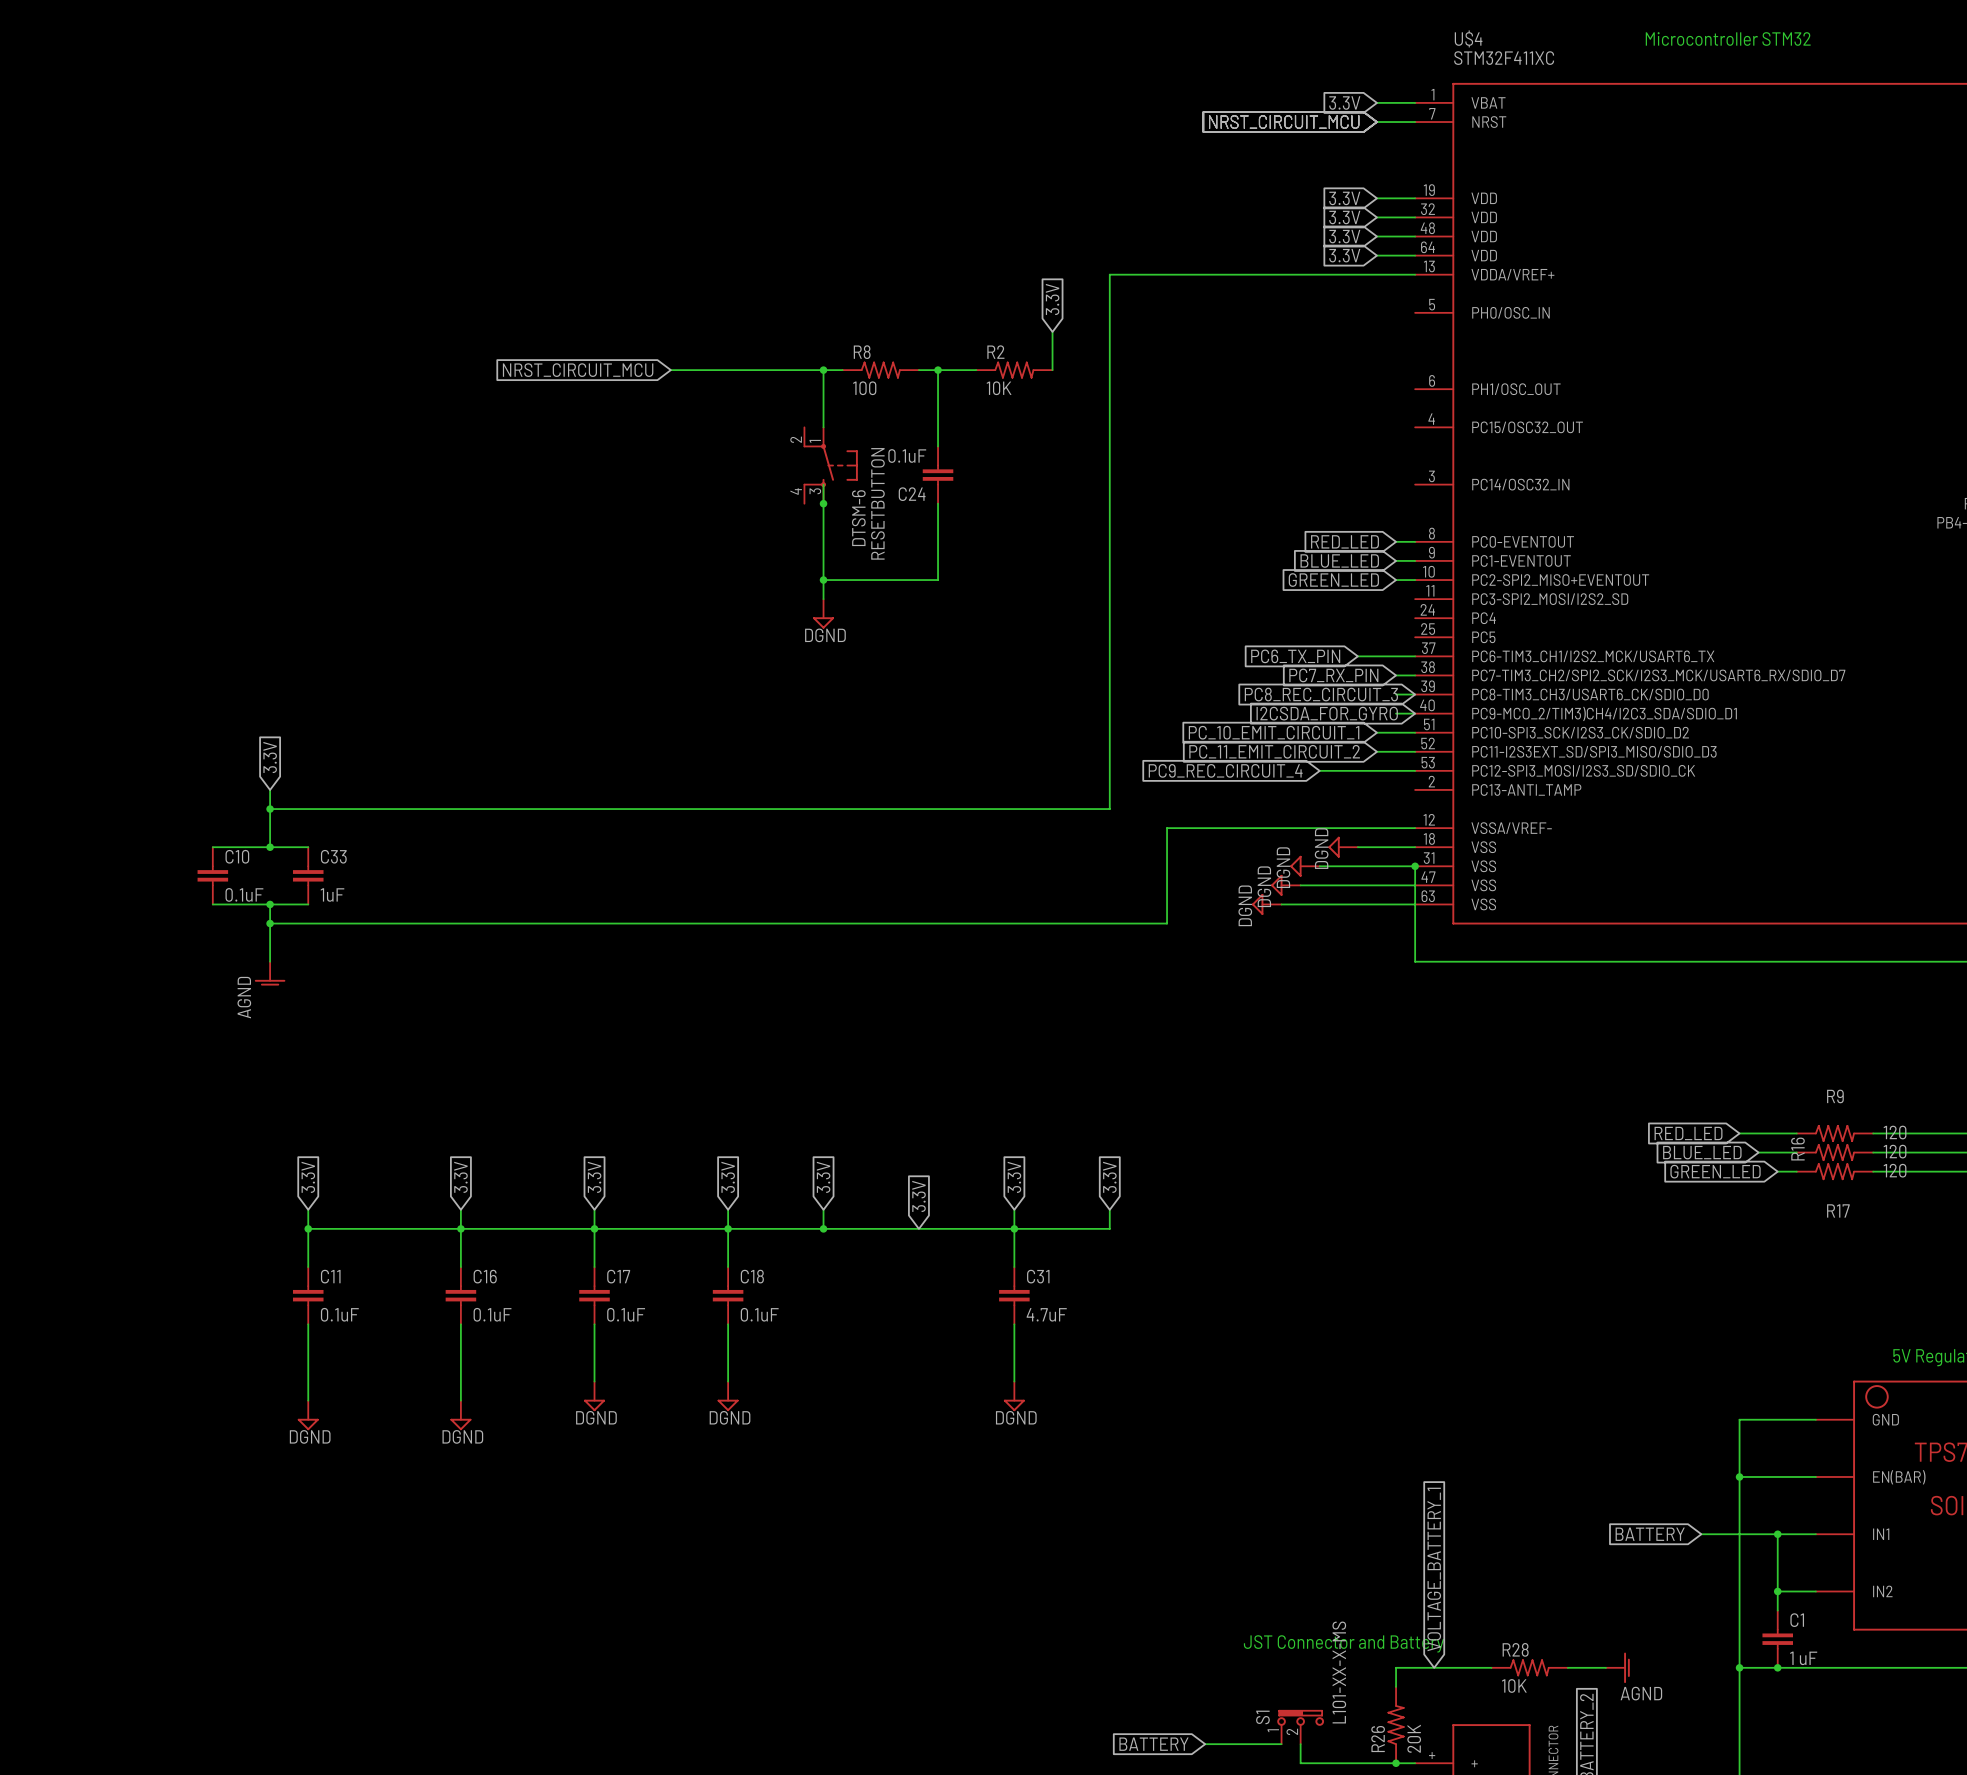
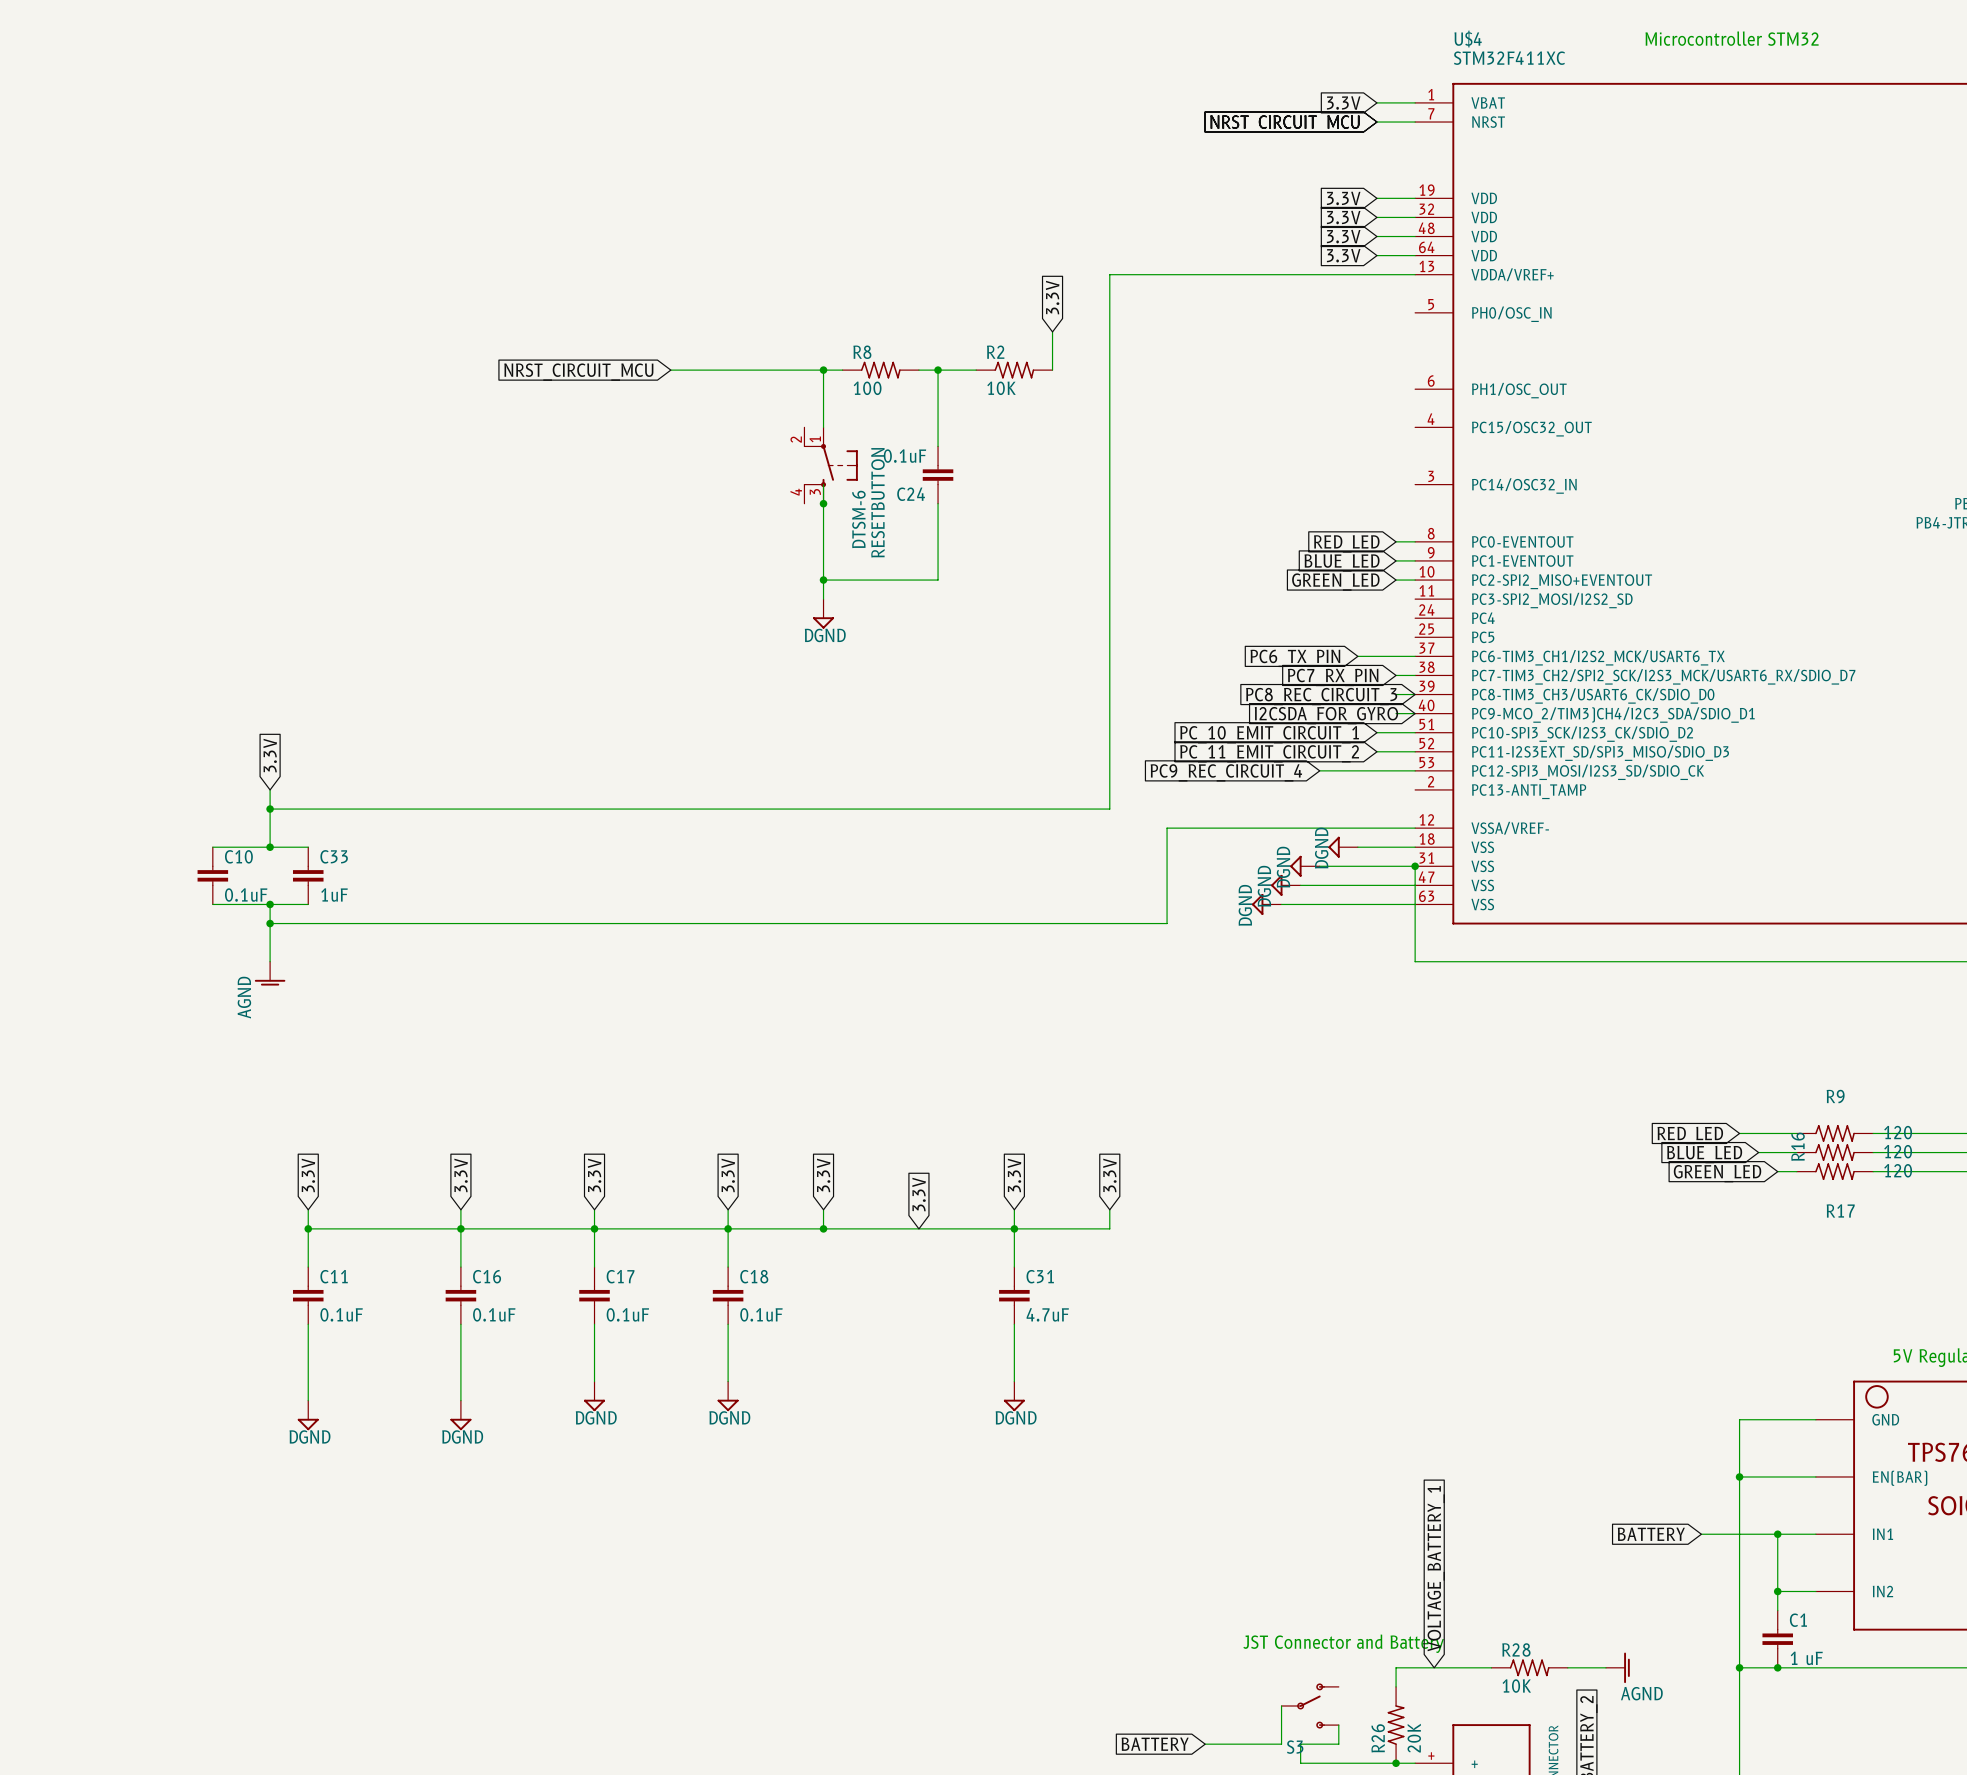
S3: none -> (1310, 1706)
wire: none -> (1338, 1725) (1338, 1744) (1300, 1744)
S1: L101-XX-X-MS (1300, 1727) -> none

